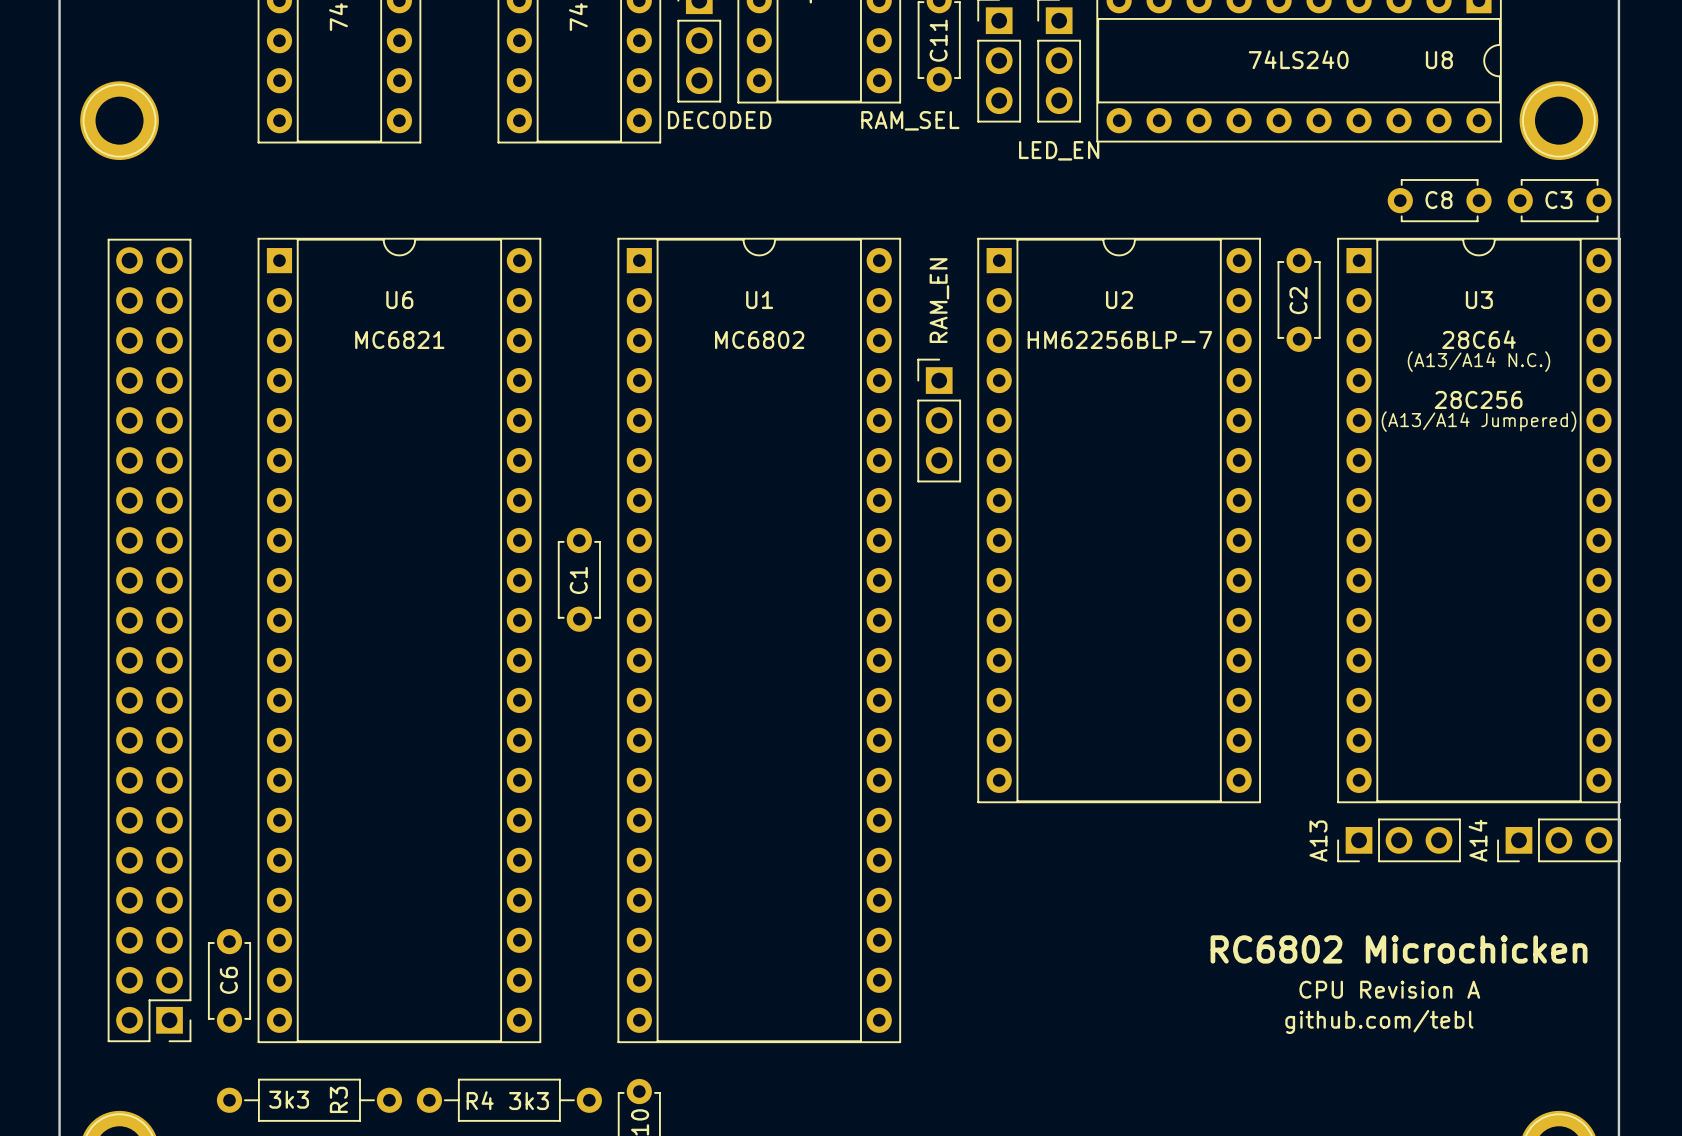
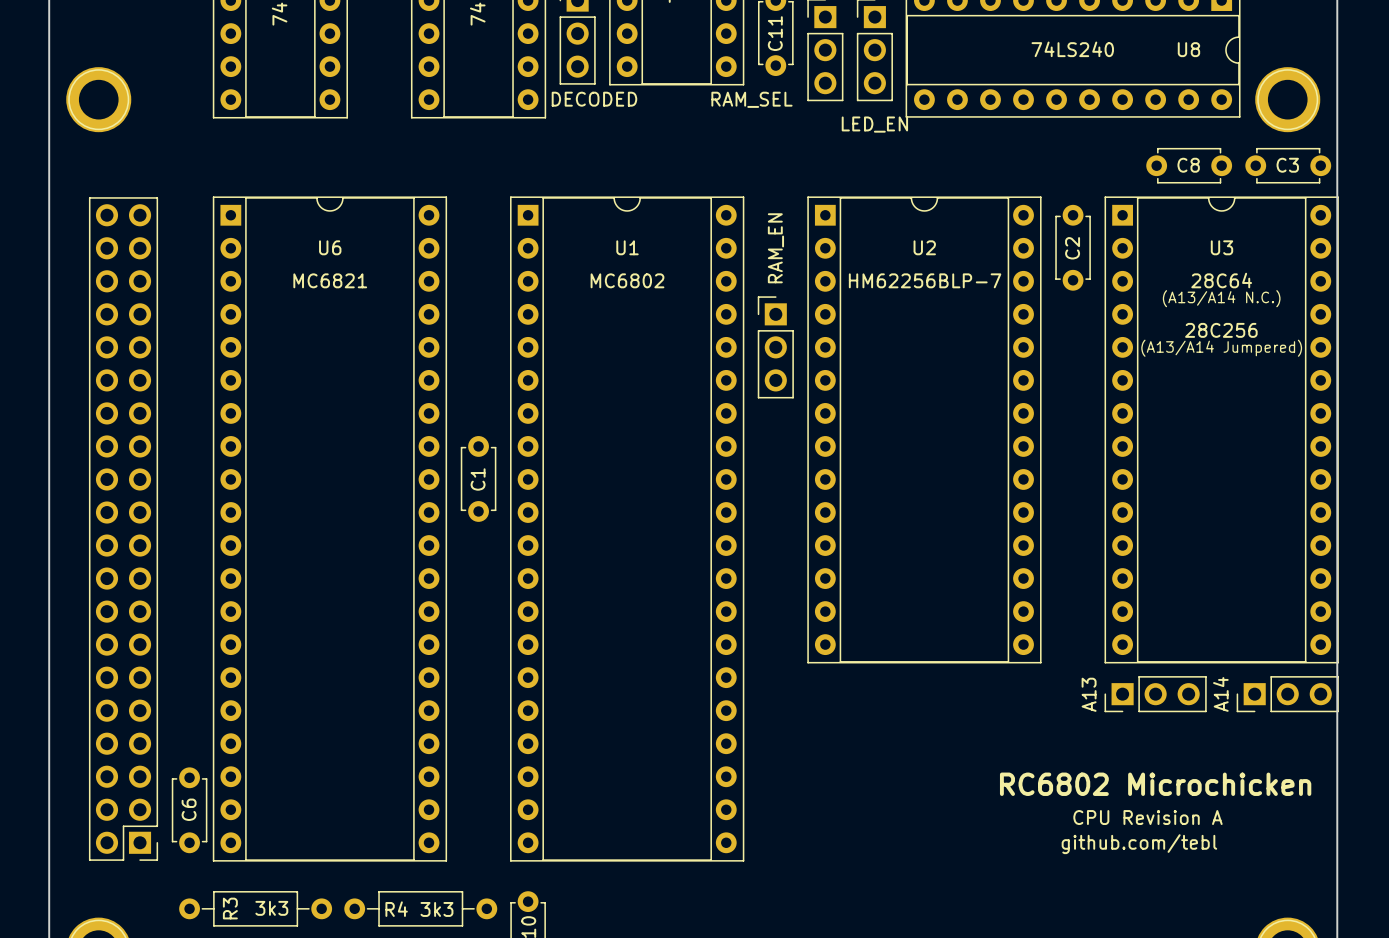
R3 value position: 3k3 (289, 1099) -> 3k3 (271, 908)
R3 name position: R3 (338, 1099) -> R3 (230, 908)

